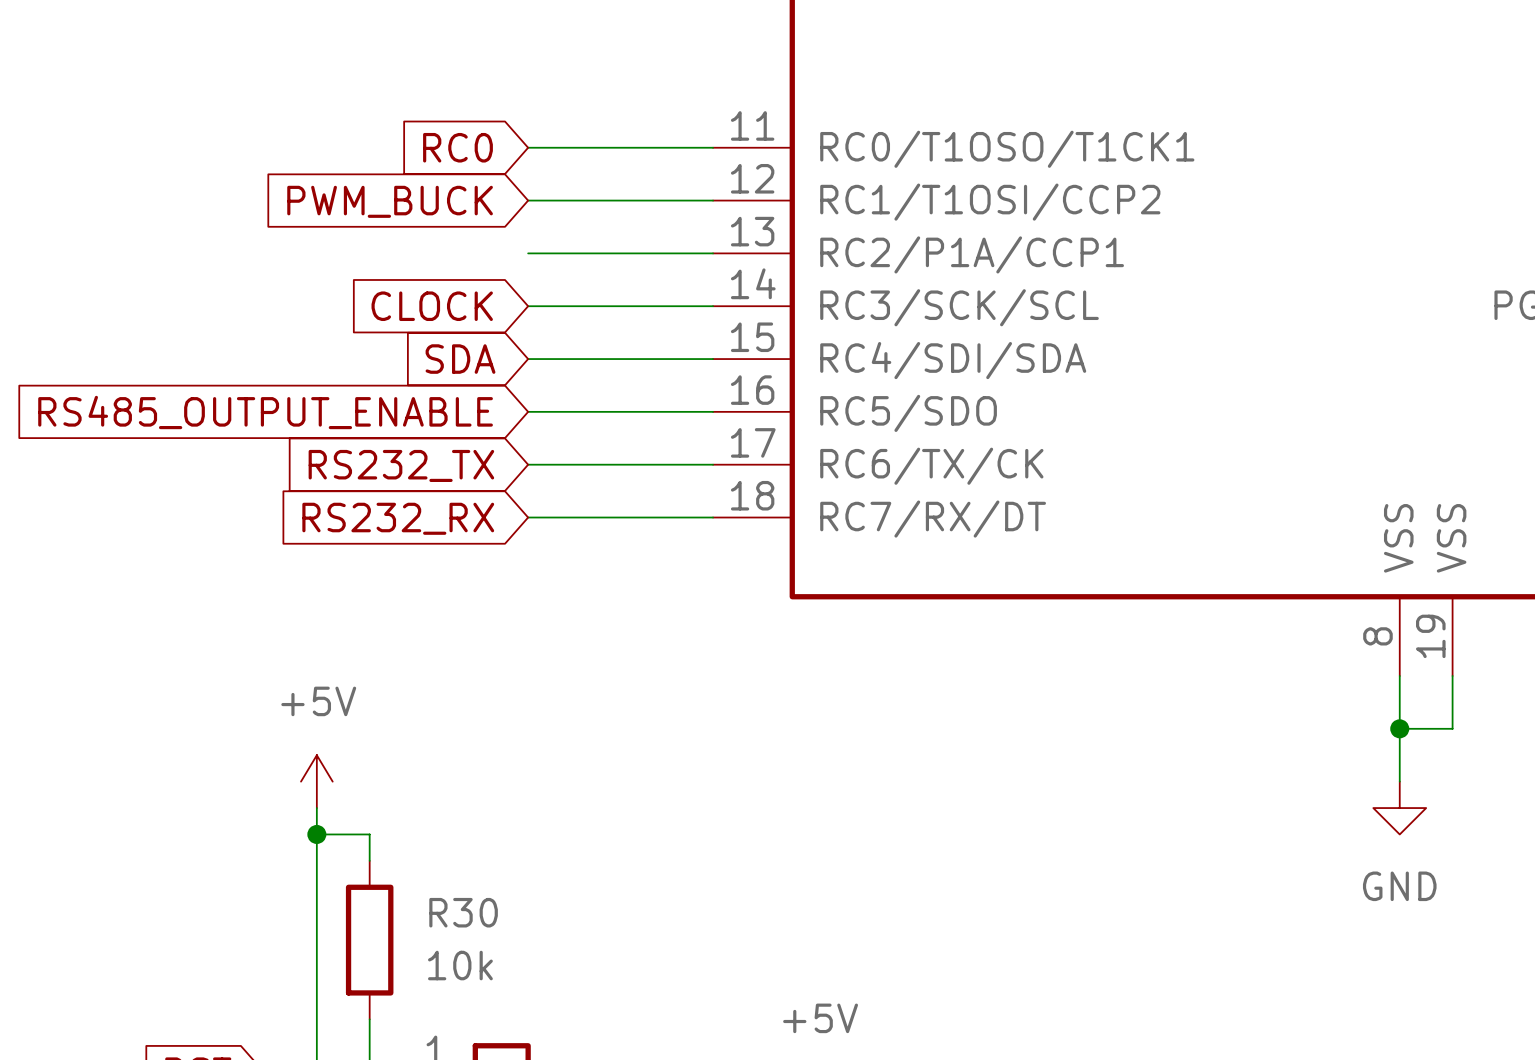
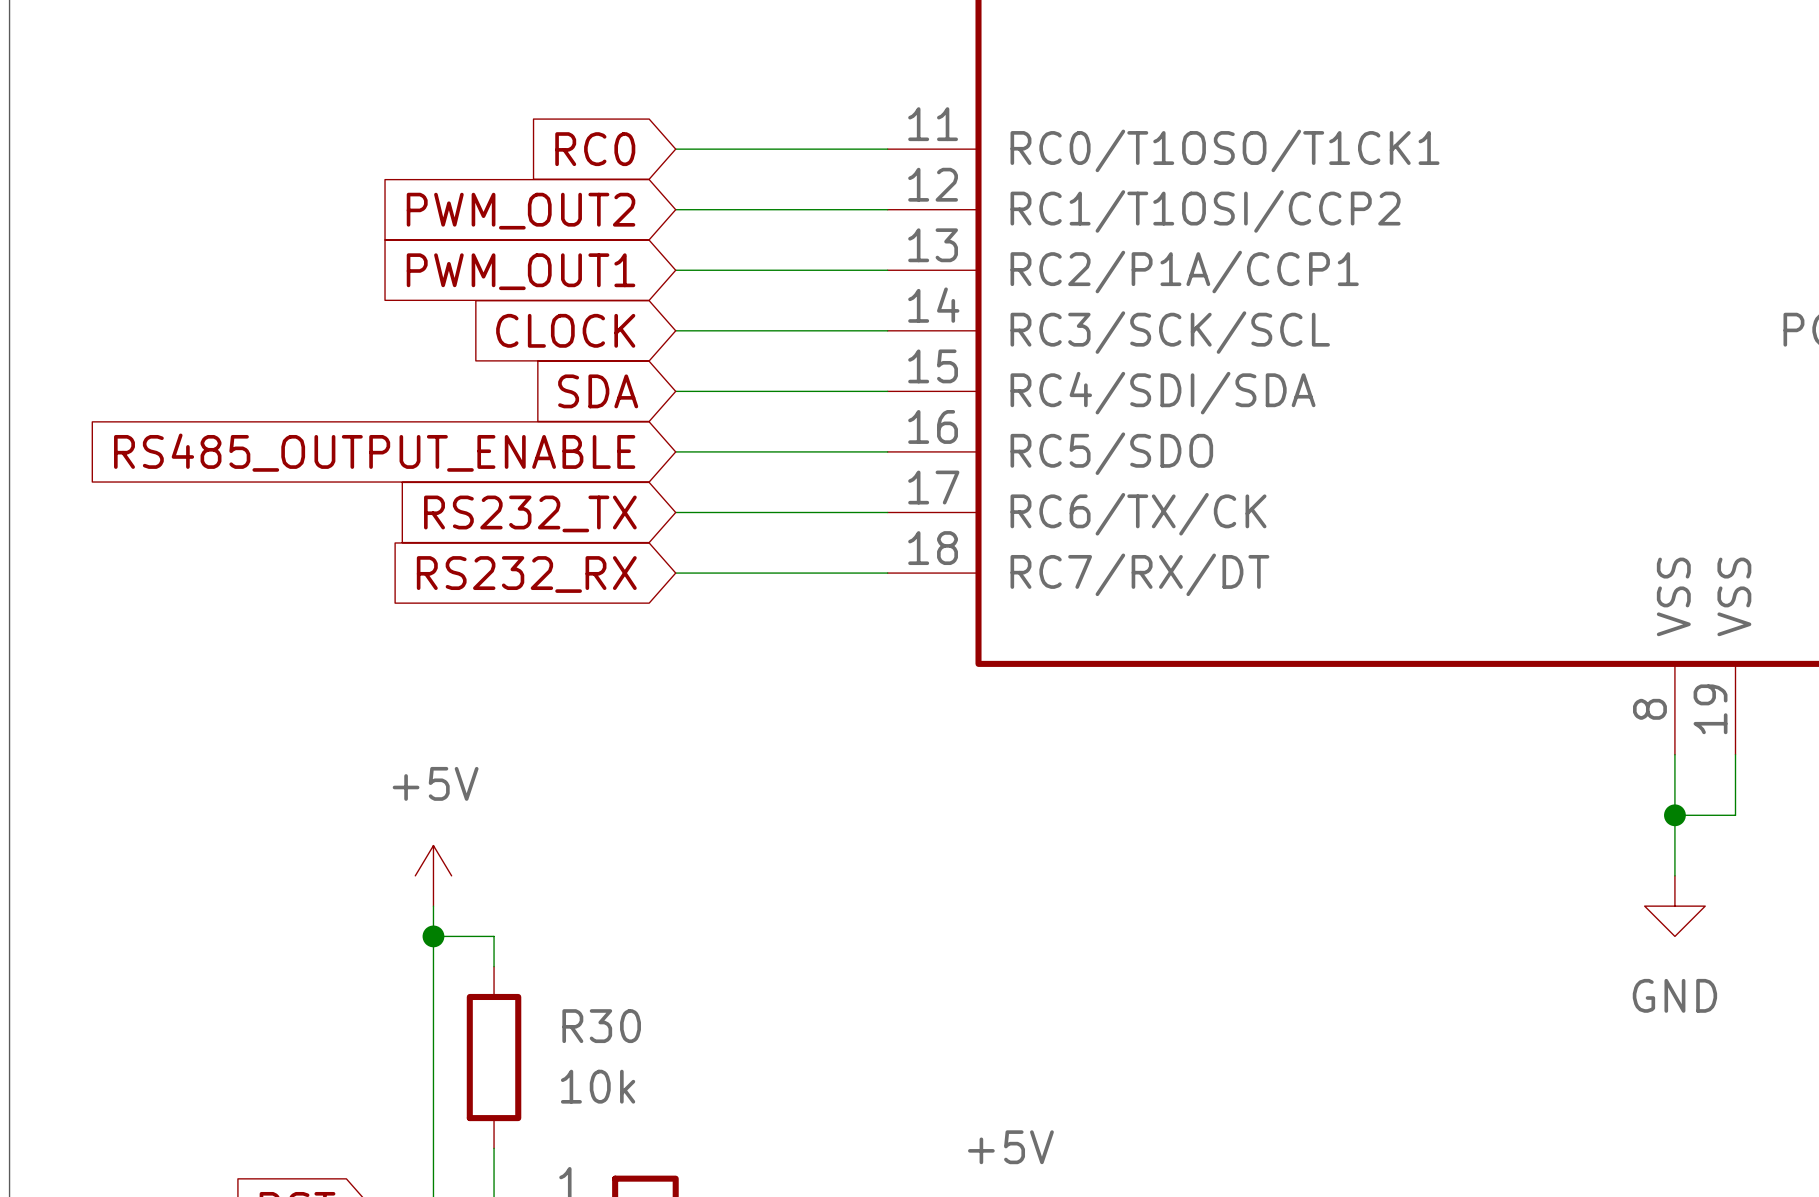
global label: PWM_BUCK (390, 201) -> PWM_OUT2 (521, 211)
global label: none -> PWM_OUT1 (521, 271)

